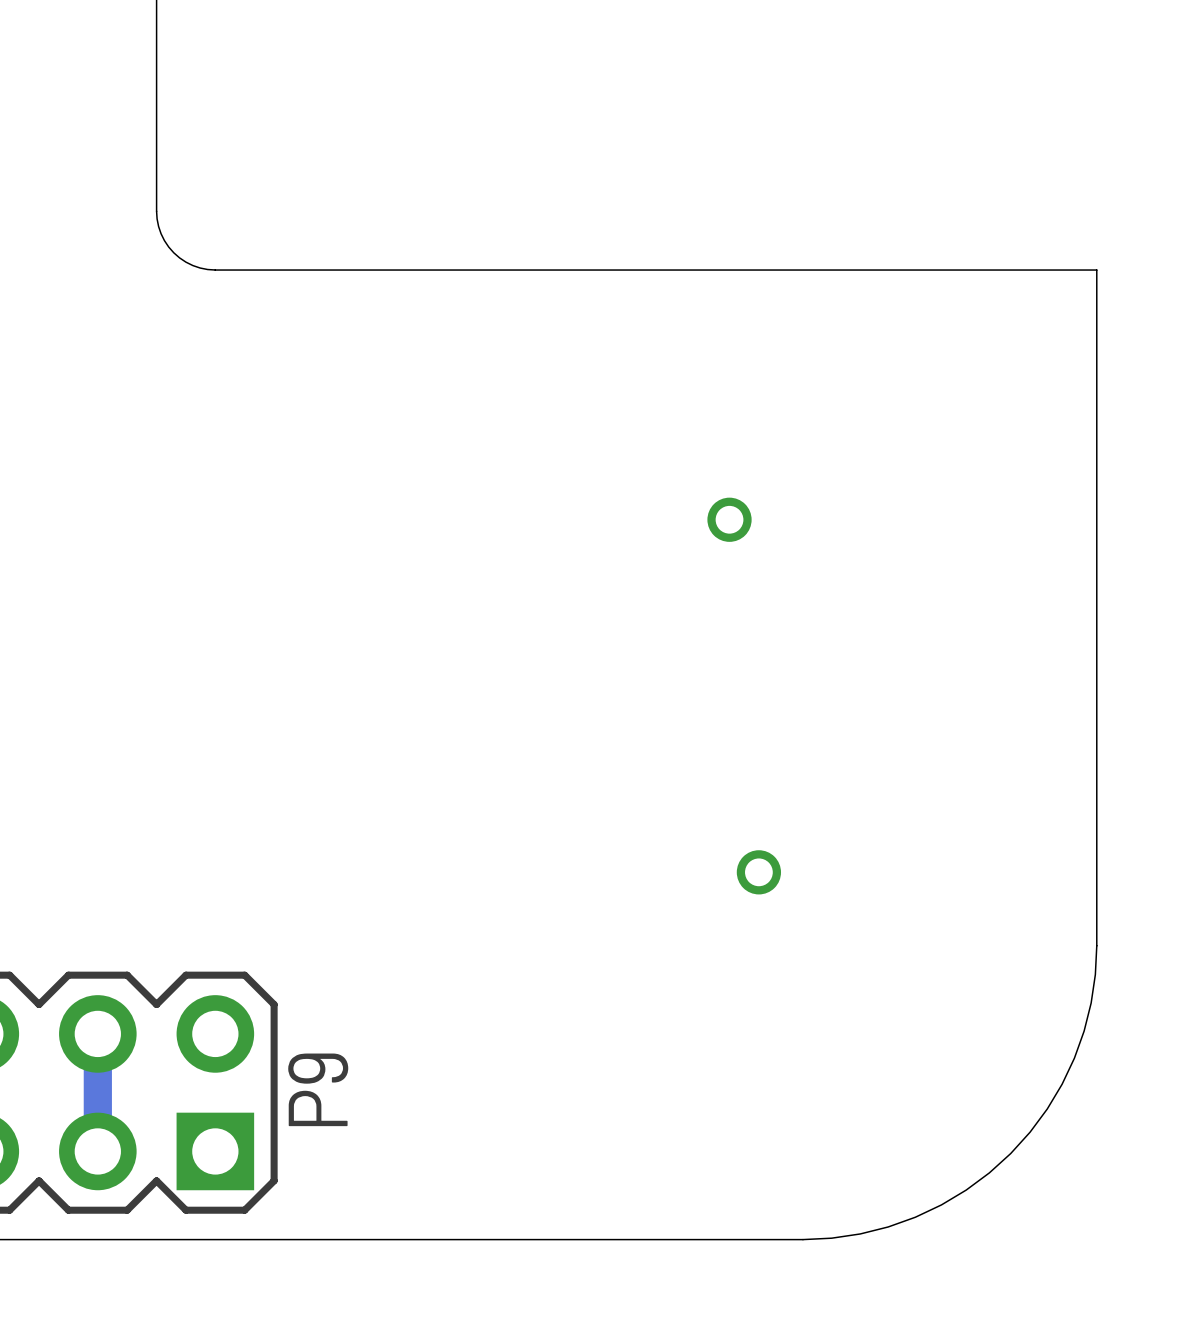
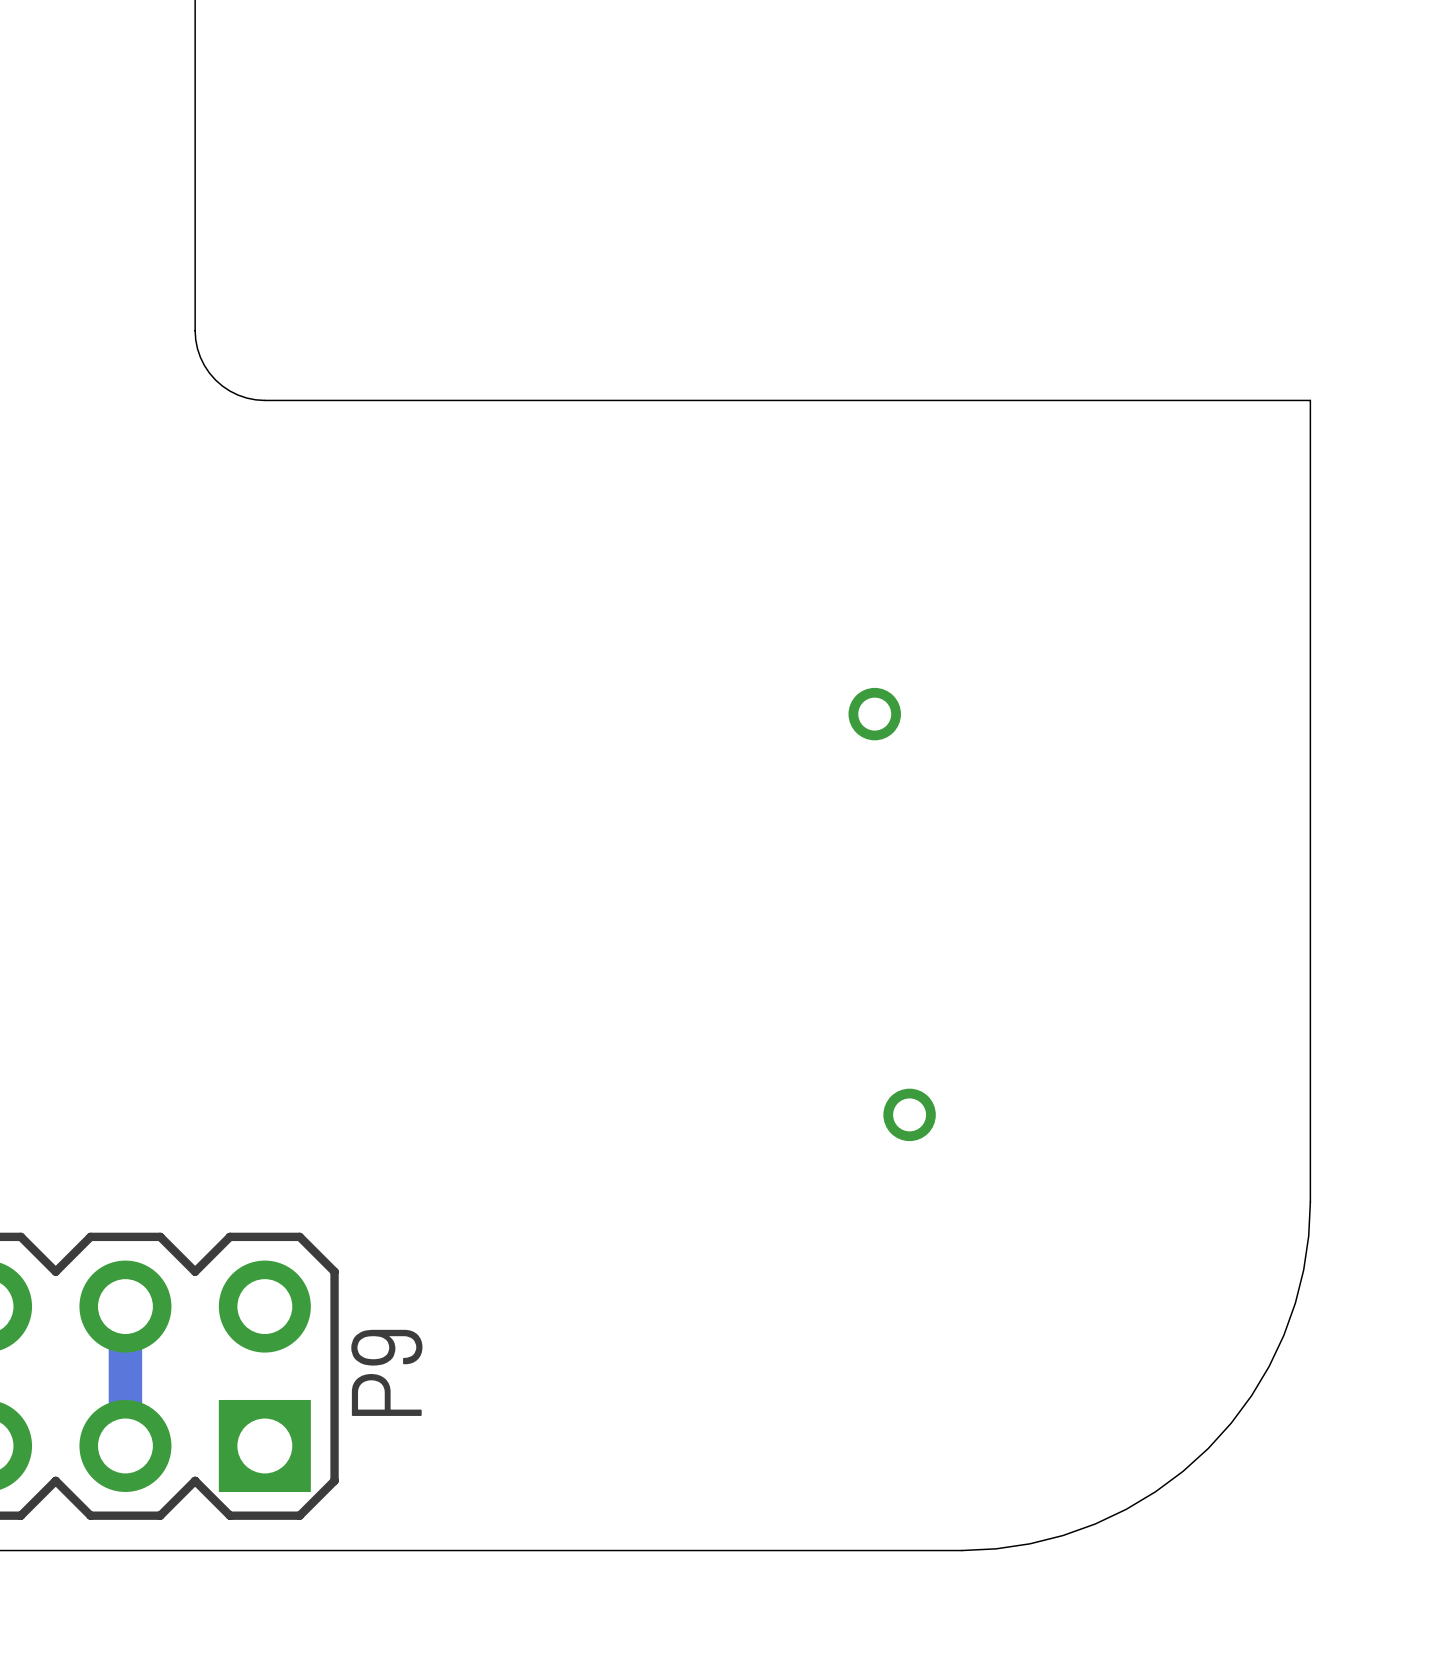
via position: (729, 519) -> (874, 714)

